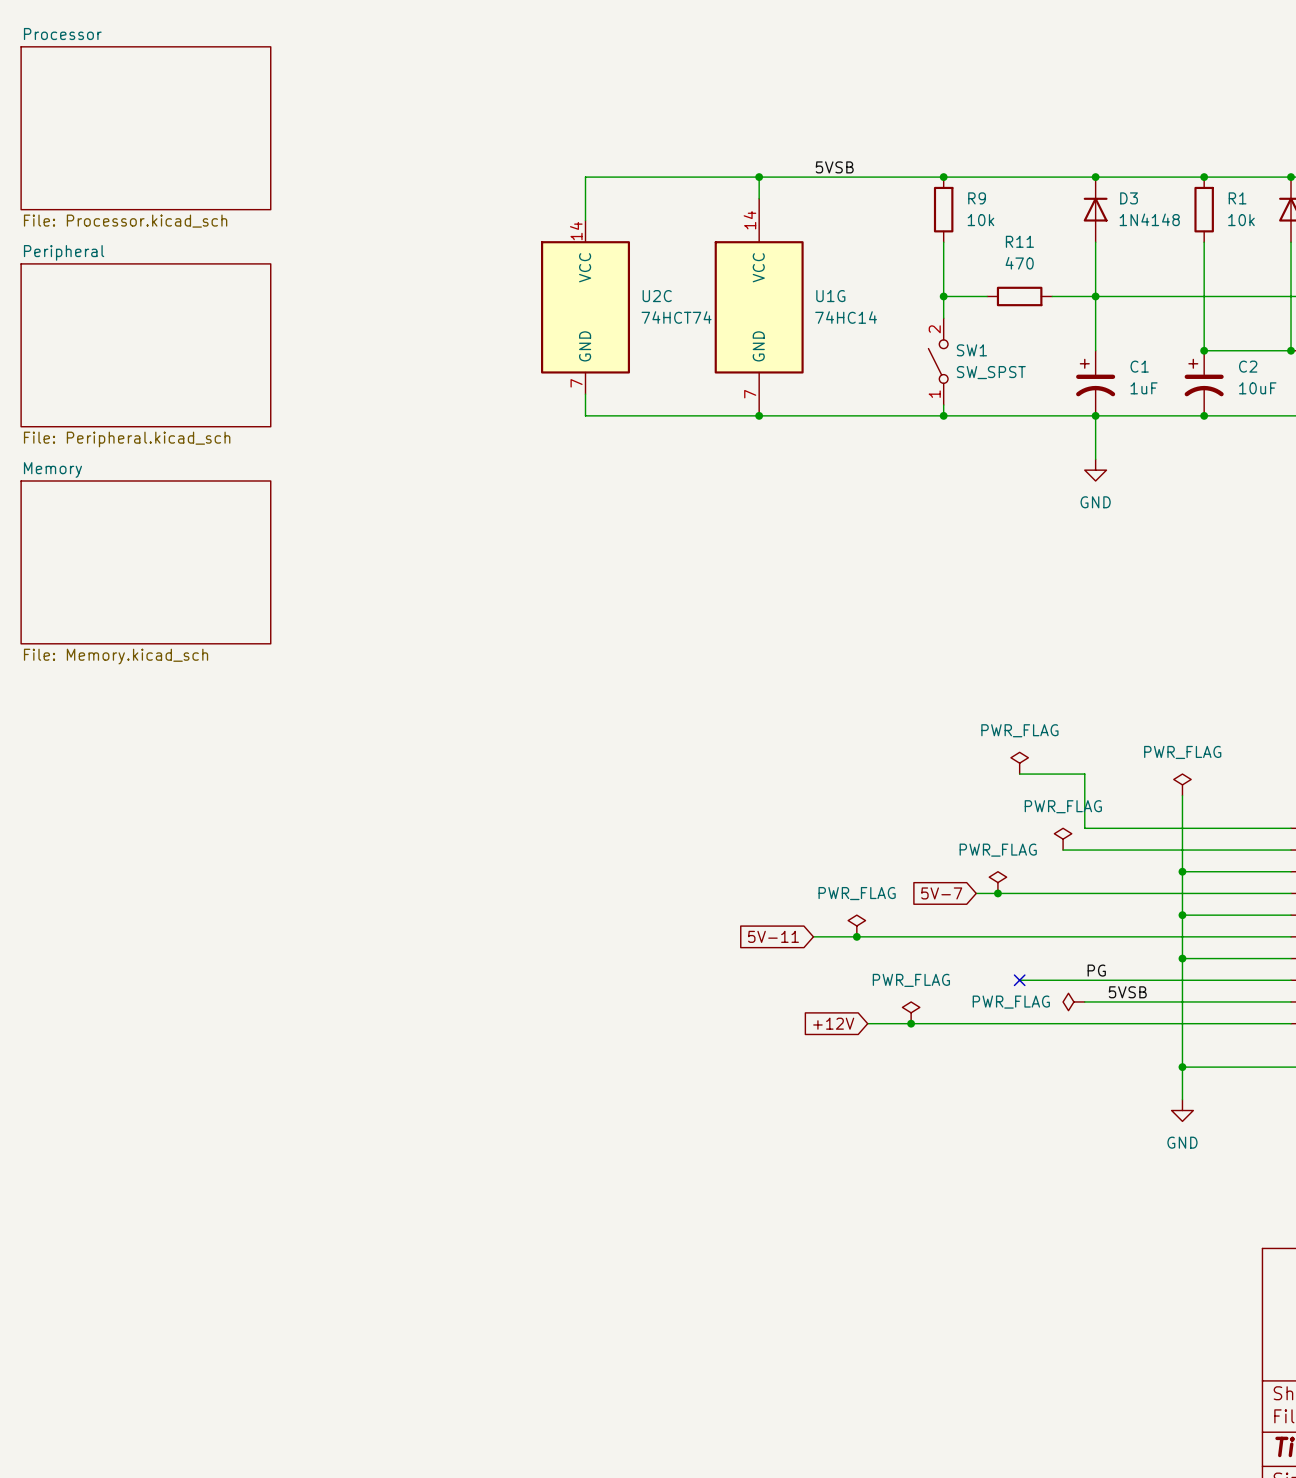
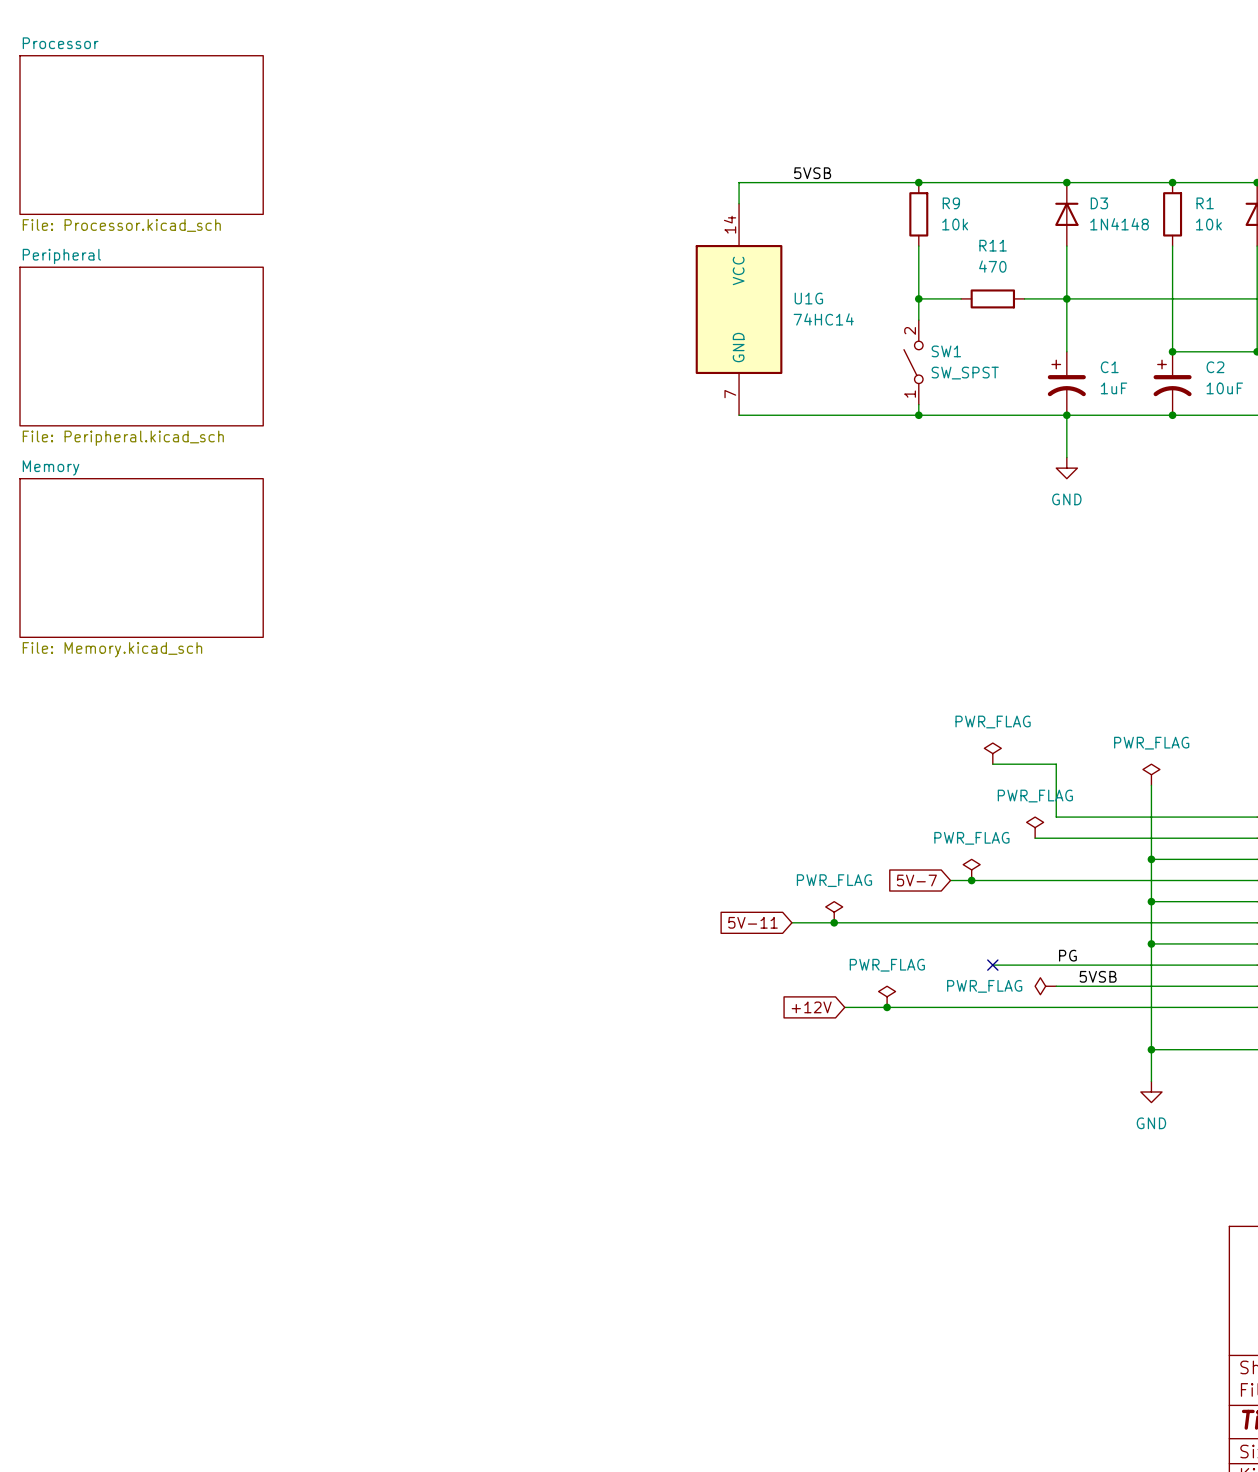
wire: (759, 177) (585, 177) (585, 220) -> none
junction: (759, 177) -> none
U2C: 74HCT74 (585, 307) -> none
wire: (585, 394) (585, 415) (759, 415) -> none
junction: (759, 415) -> none

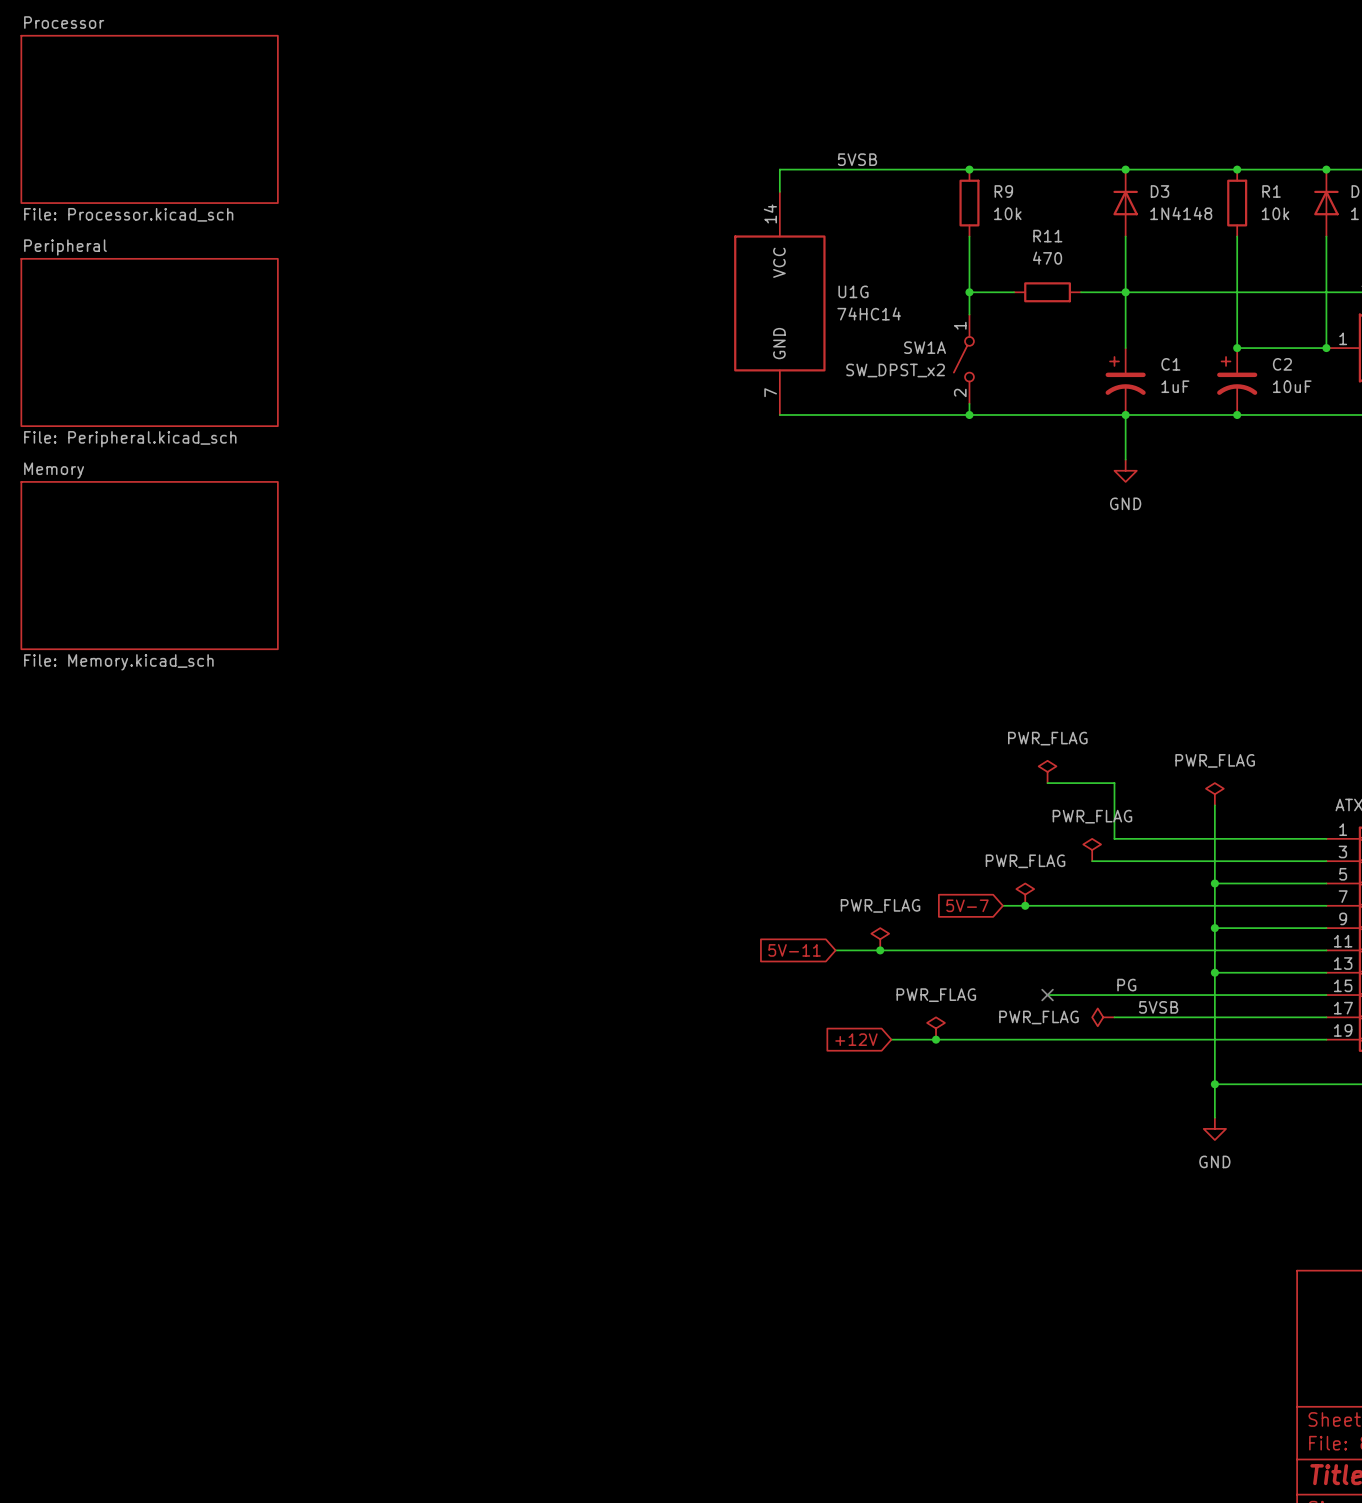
SW1: SW_SPST (913, 362) -> none
SW1A: none -> SW_DPST_x2 (963, 359)

